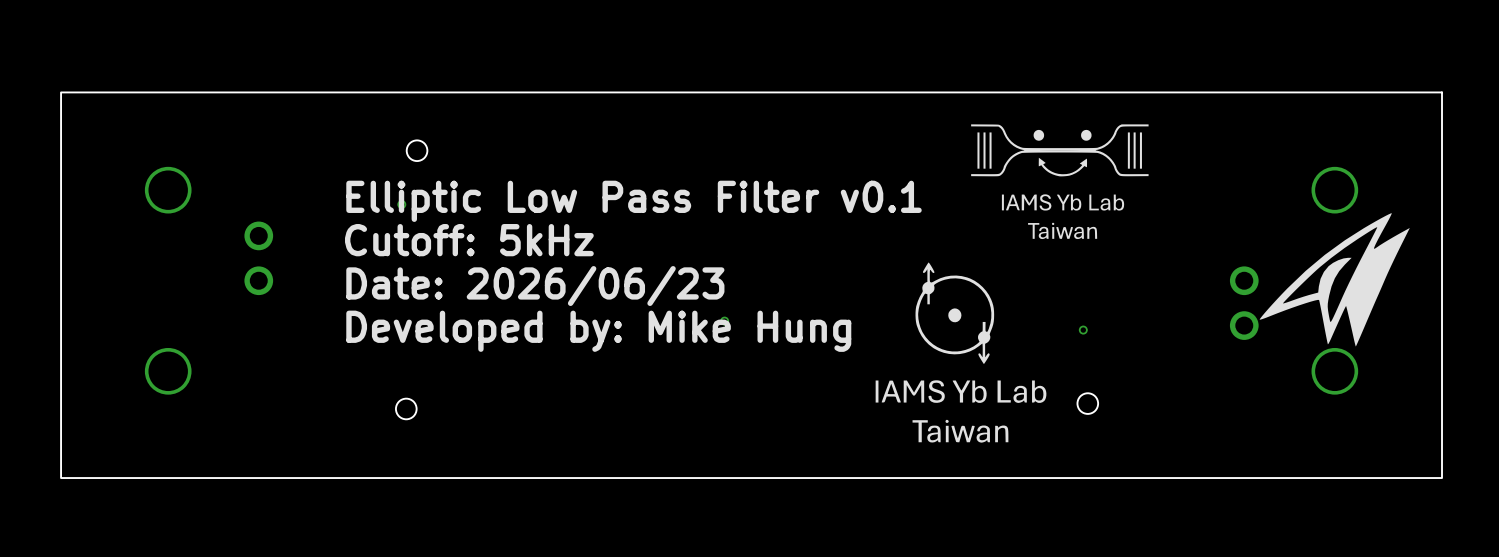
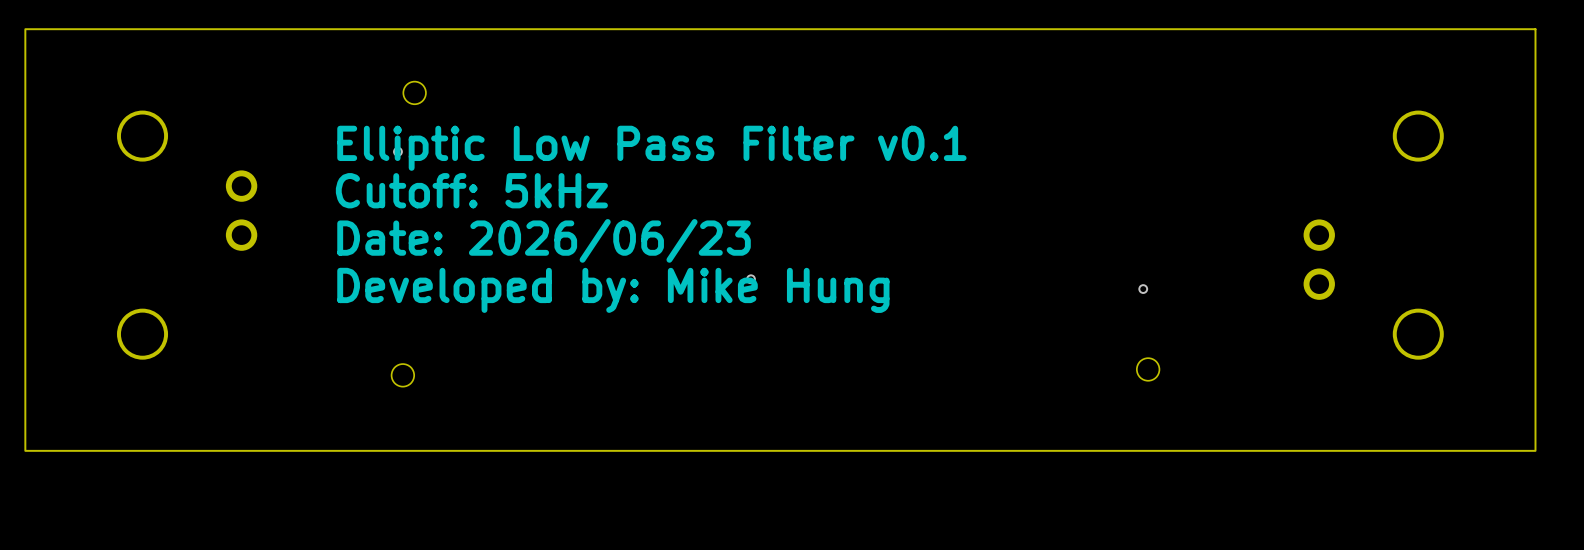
drawing: [971, 124, 1149, 240] -> none
drawing: [1259, 213, 1410, 347] -> none
drawing: [875, 262, 1047, 443] -> none

